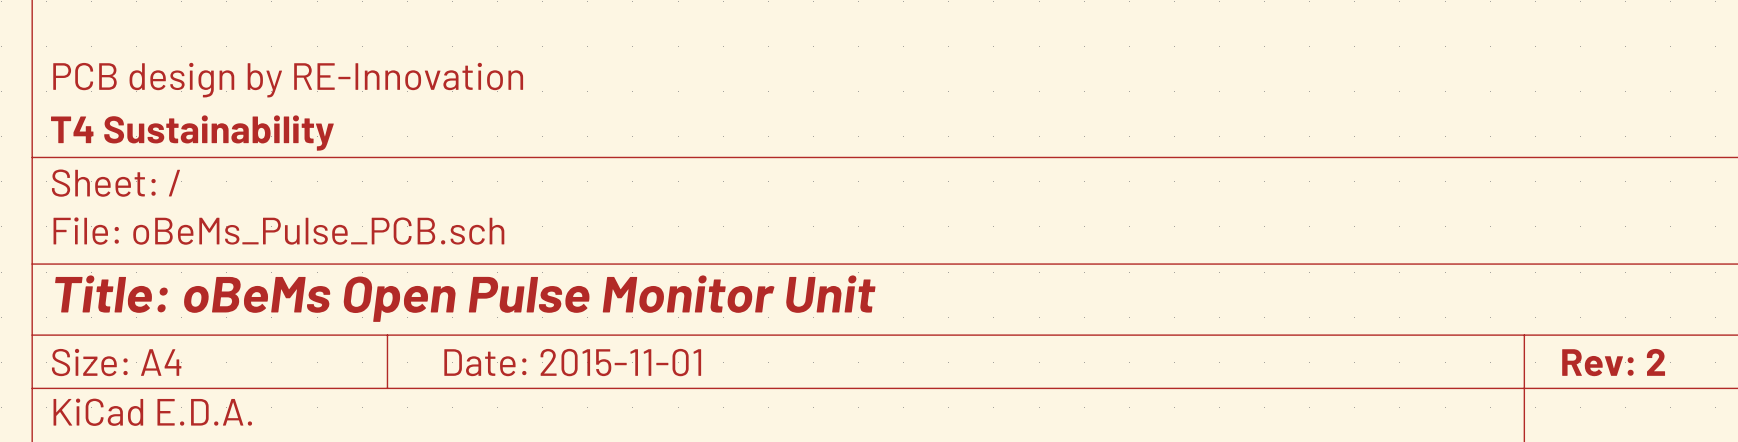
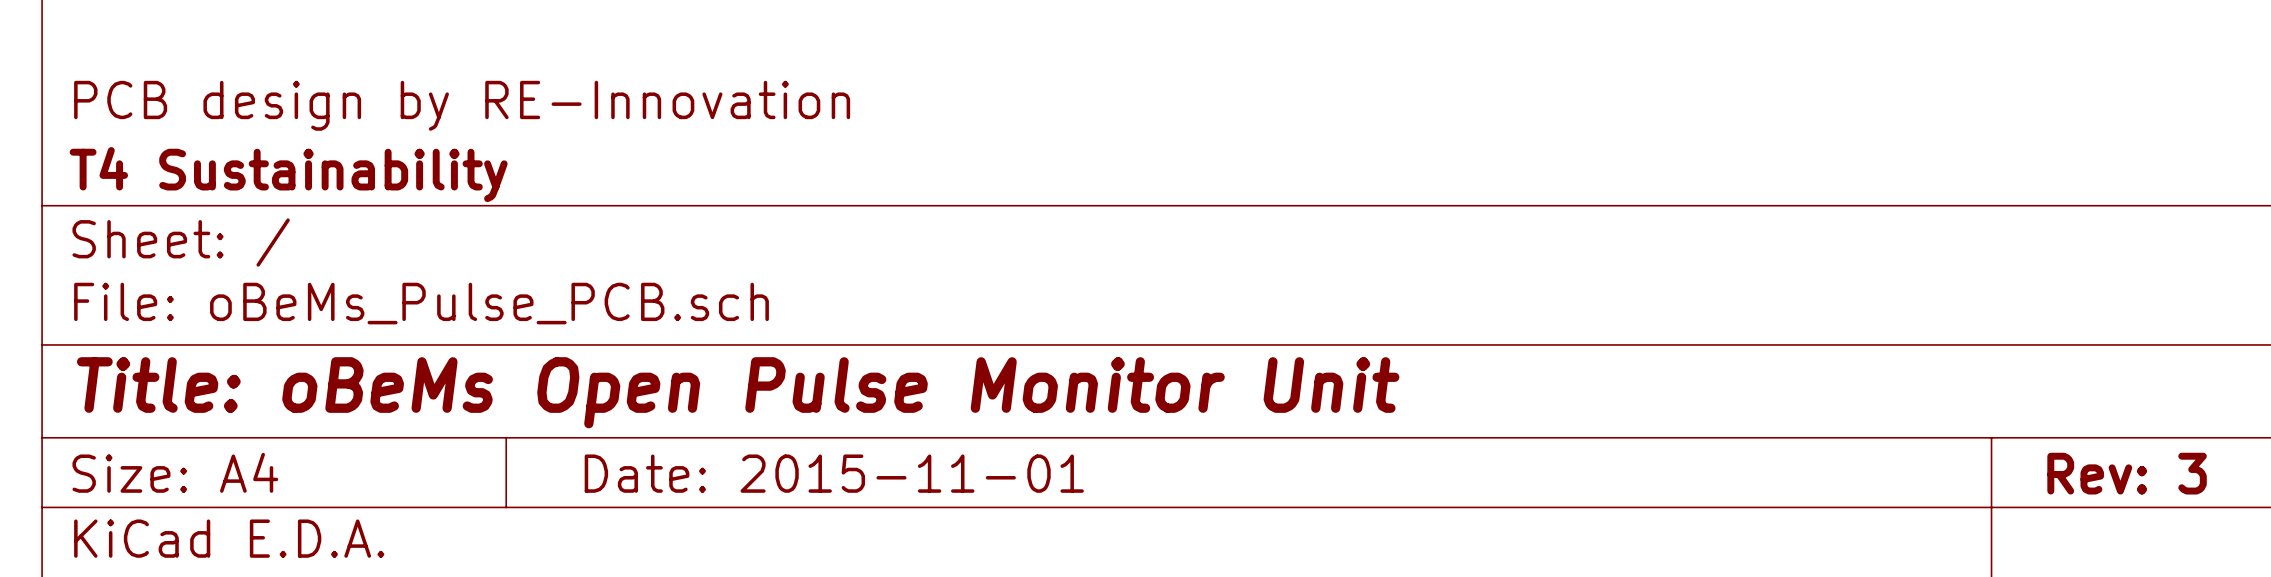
title block: Rev: 2 (1613, 362) -> Rev: 3 (2127, 473)

